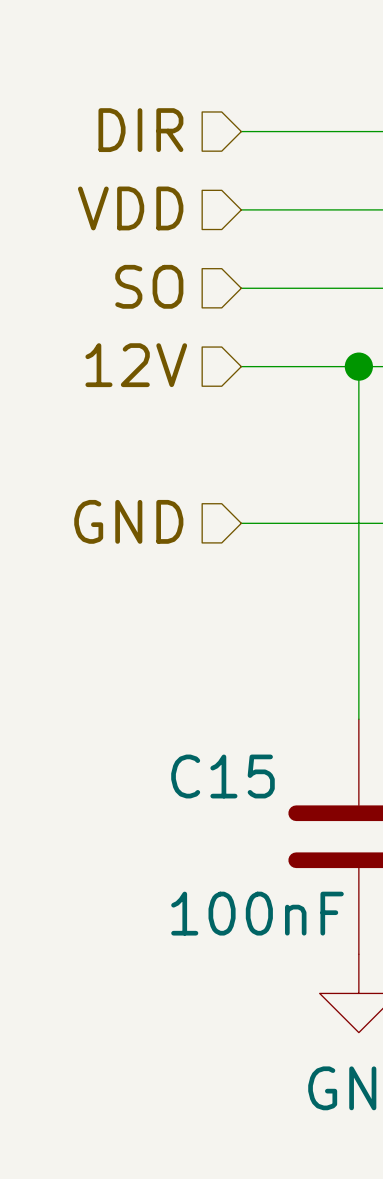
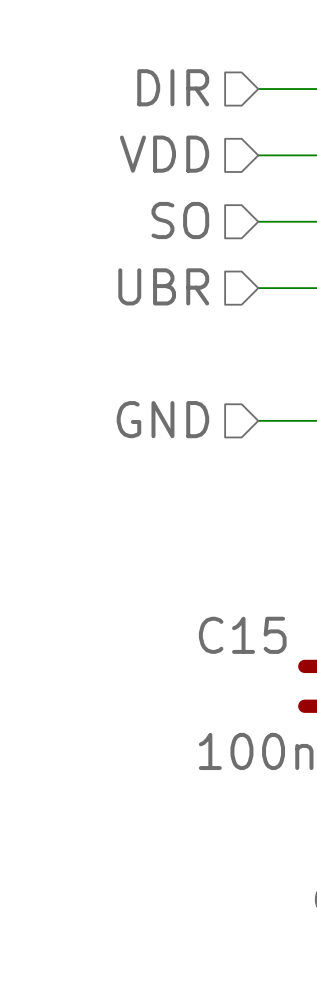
hierarchical label: 12V (136, 365) -> UBR (163, 286)

